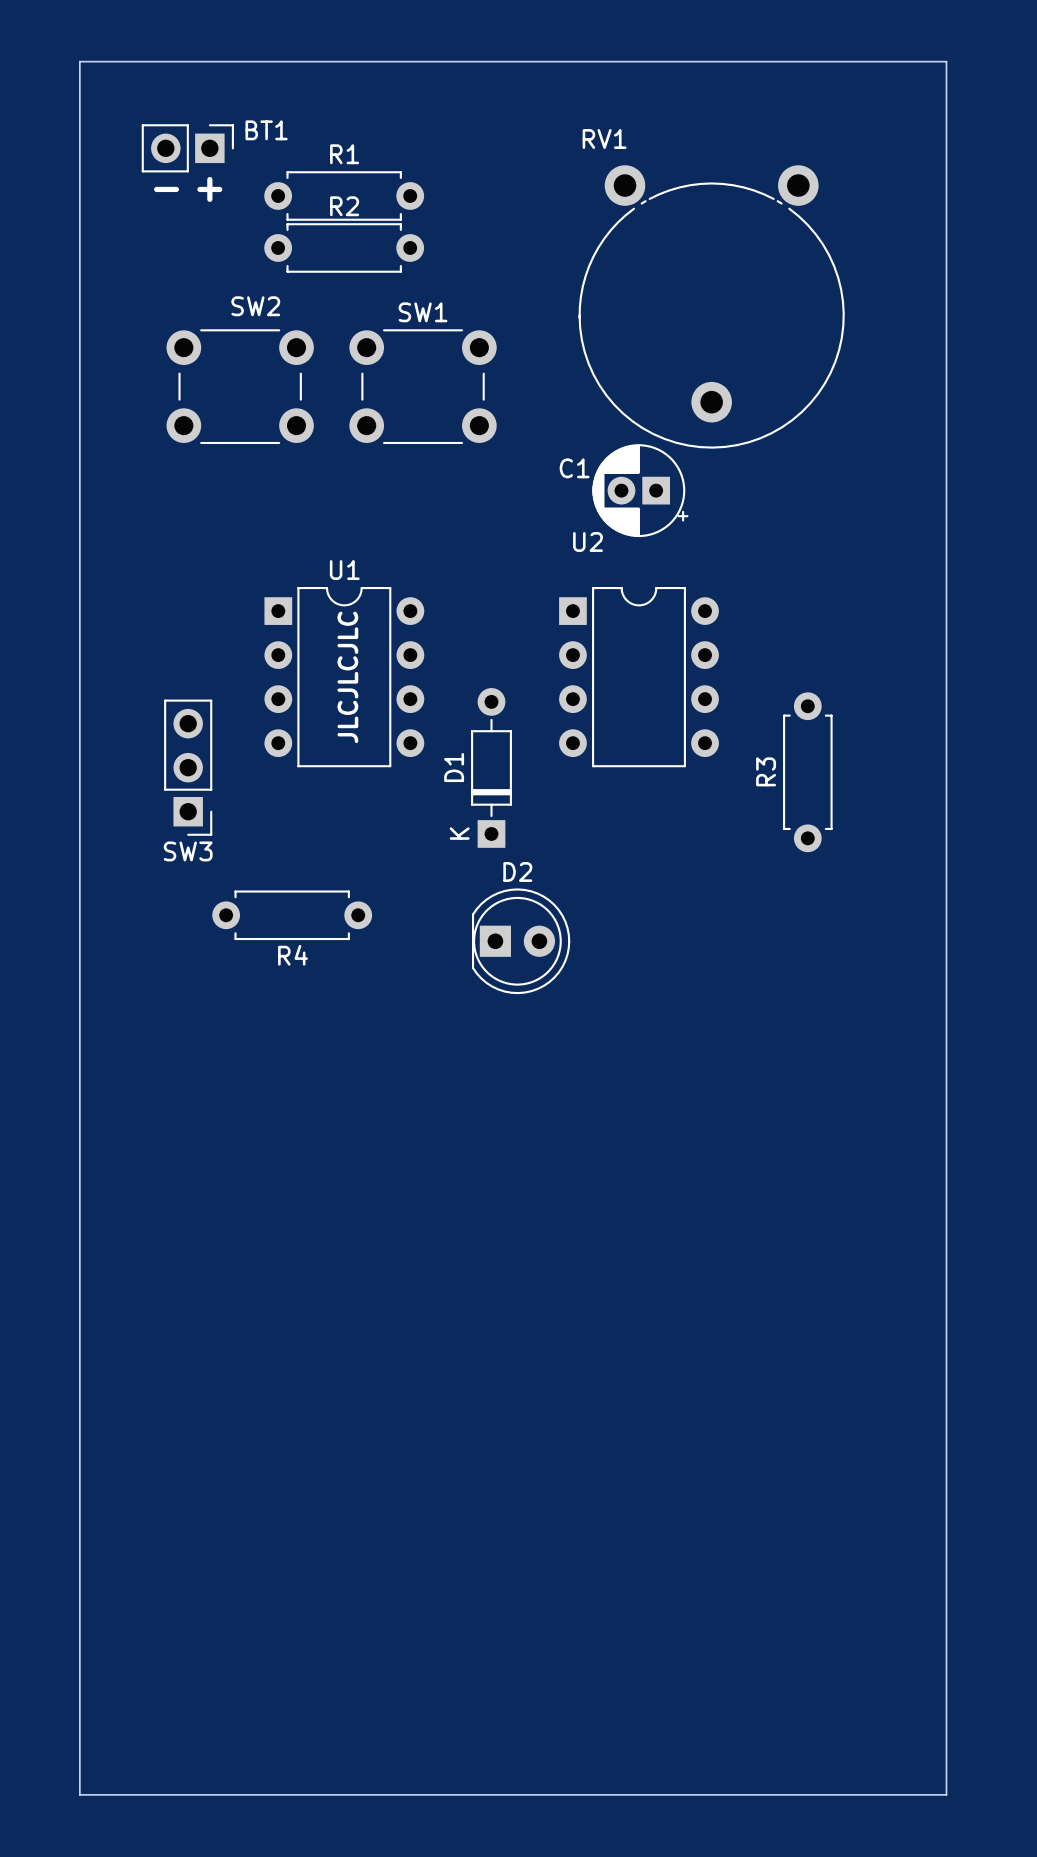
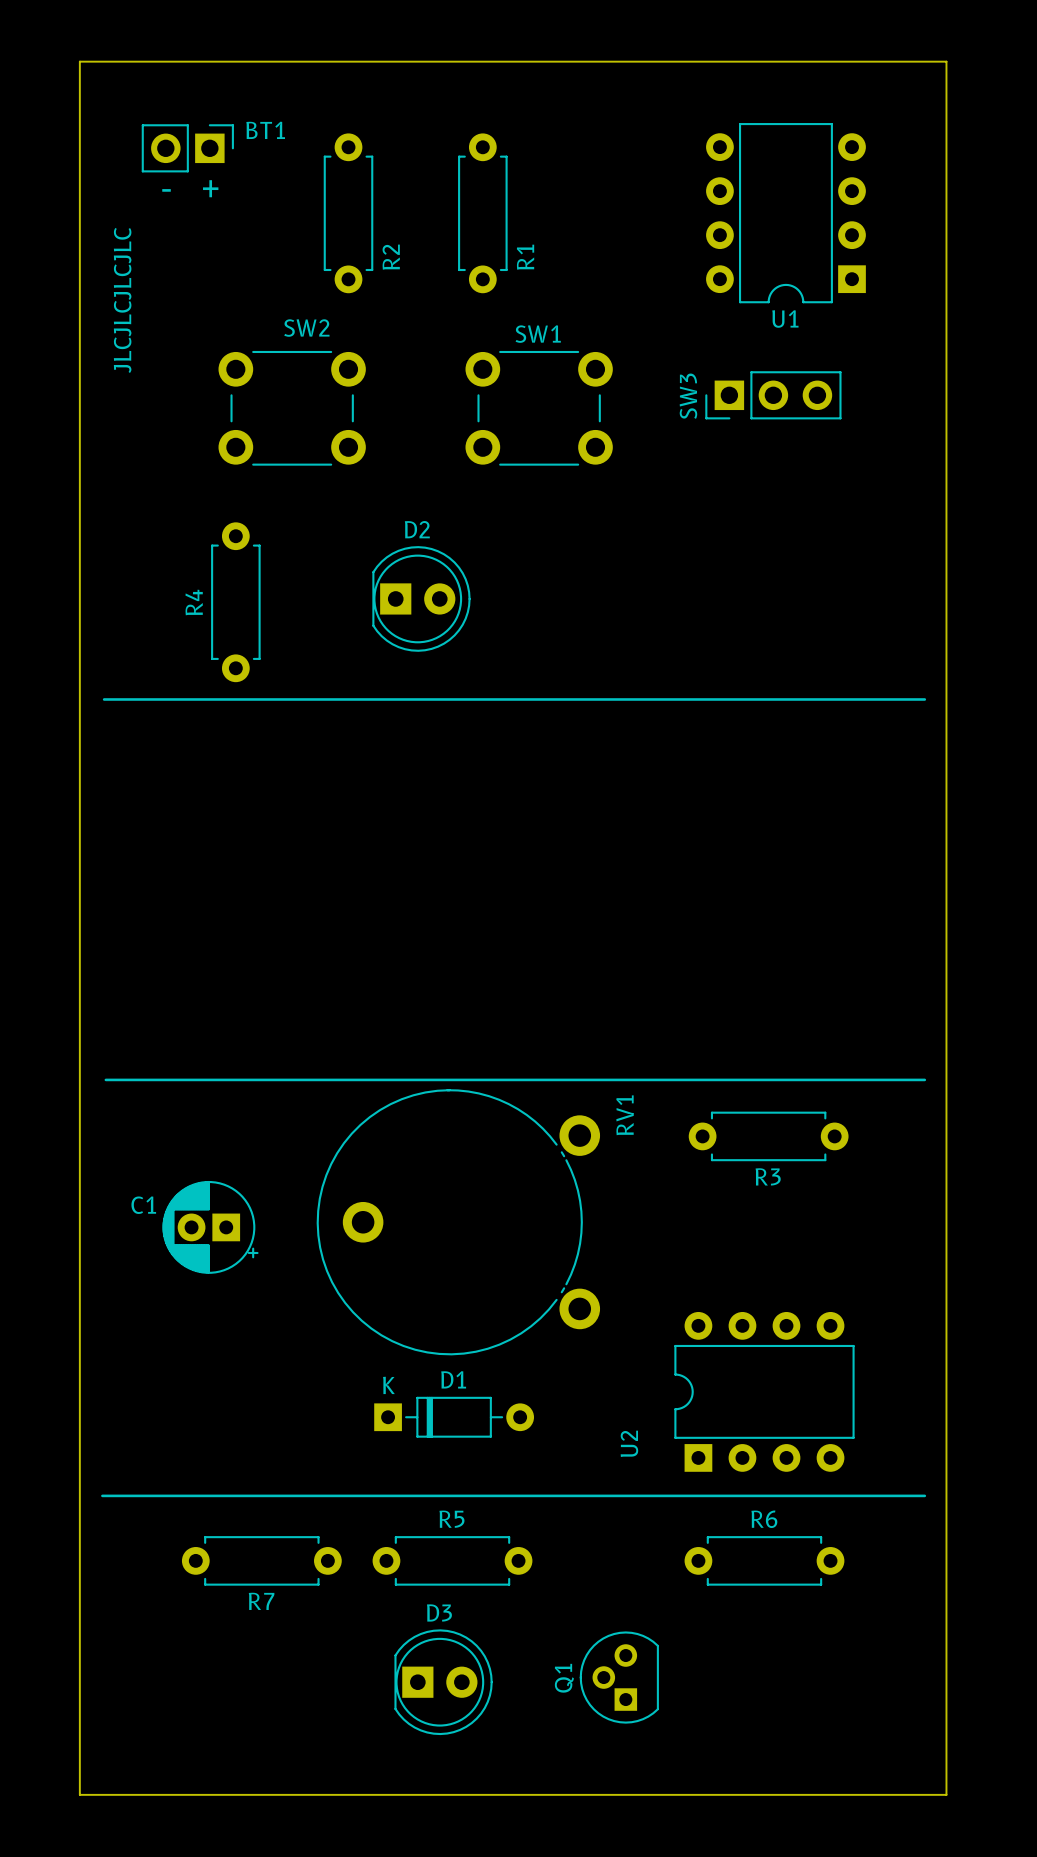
R1 name position: R1 (344, 154) -> R1 (525, 257)
R1 rotation: 0° (344, 195) -> 90° clockwise (482, 213)
R1 position: (344, 195) -> (482, 213)
R2 name position: R2 (344, 206) -> R2 (391, 257)
R2 rotation: 0° (344, 247) -> 90° clockwise (348, 213)
text: none -> JLCJLCJLCJLC (122, 300)
RV1 rotation: 0° (711, 306) -> 90° clockwise (458, 1222)
RV1 position: (711, 306) -> (458, 1222)
SW2 position: (240, 386) -> (292, 408)
SW1 position: (423, 386) -> (539, 408)
C1 position: (640, 490) -> (210, 1227)
U1 rotation: 0° (344, 677) -> 180° (785, 213)
U1 position: (344, 677) -> (785, 213)
text: JLCJLCJLC (347, 677) -> none
U2 rotation: 0° (638, 677) -> 90° counterclockwise (764, 1391)
U2 position: (638, 677) -> (764, 1391)
line: none -> (104, 699) (924, 699)
SW3 rotation: 0° (188, 767) -> 90° clockwise (773, 395)
SW3 position: (188, 767) -> (773, 395)
D1 rotation: 0° (491, 767) -> 90° clockwise (454, 1417)
D1 position: (491, 767) -> (454, 1417)
R3 name position: R3 (766, 771) -> R3 (768, 1176)
R3 rotation: 0° (807, 772) -> 90° clockwise (768, 1136)
R3 position: (807, 772) -> (768, 1136)
R4 rotation: 0° (292, 915) -> 90° clockwise (235, 602)
R4 position: (292, 915) -> (235, 602)
D2 position: (521, 941) -> (421, 598)
line: none -> (105, 1079) (924, 1079)
line: none -> (102, 1495) (924, 1495)
R7: none -> (261, 1560)
R5: none -> (452, 1560)
R6: none -> (764, 1560)
Q1: none -> (619, 1677)
D3: none -> (443, 1682)

